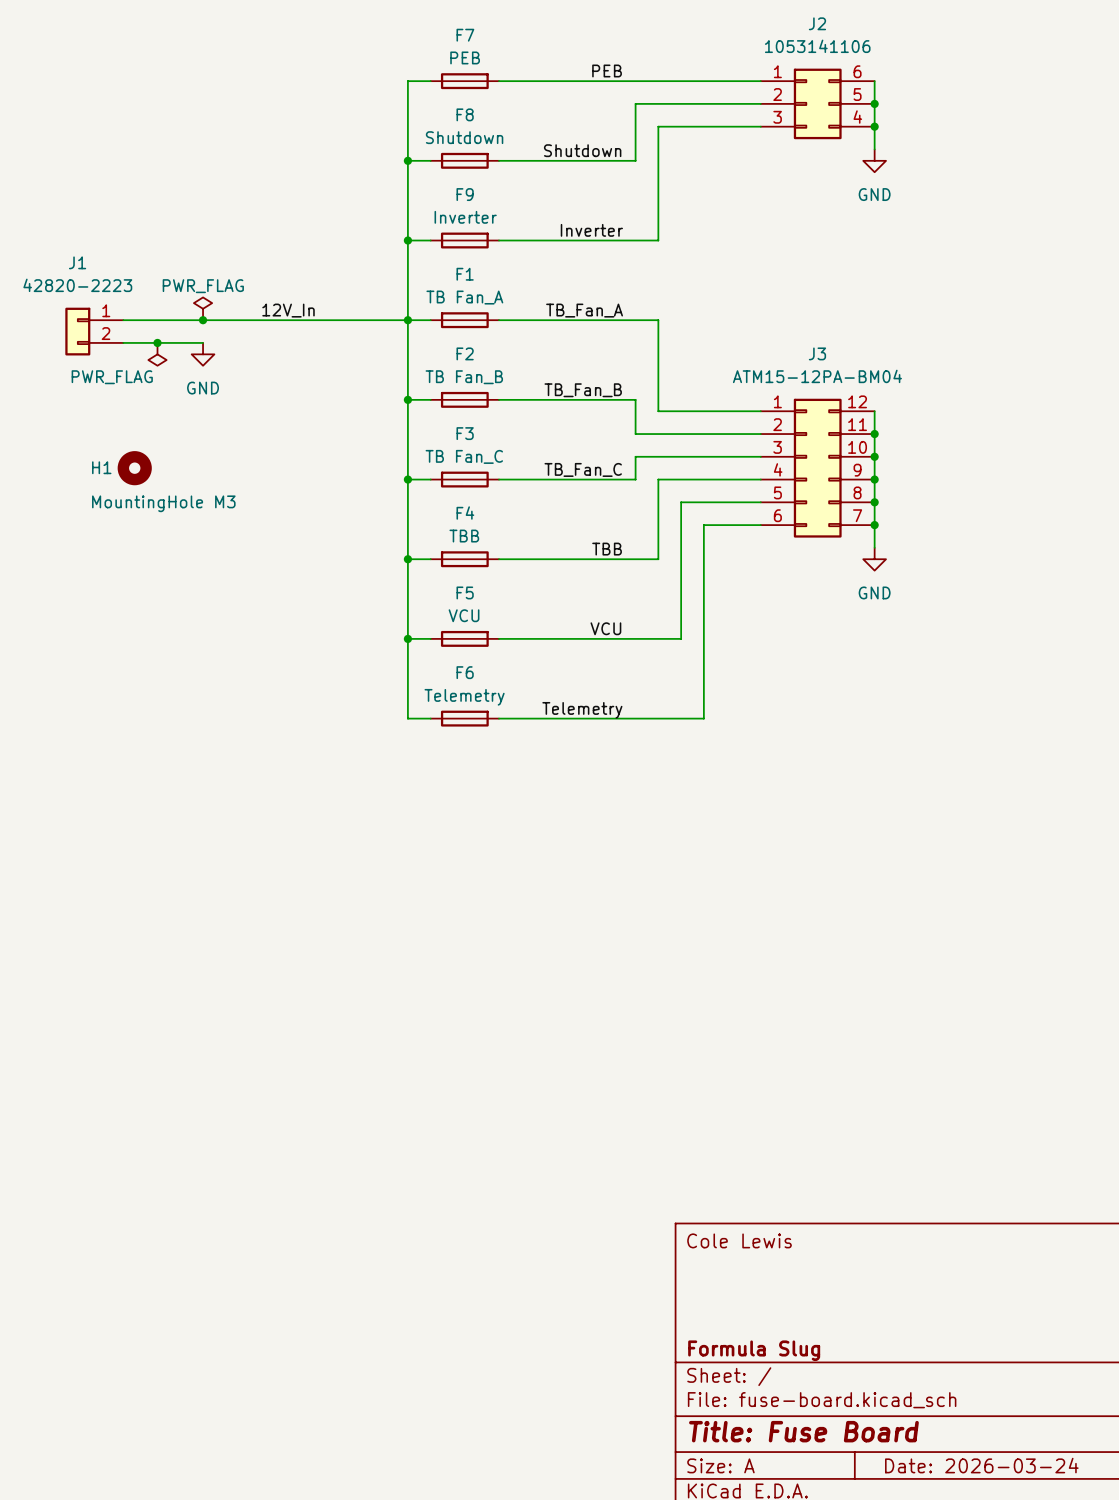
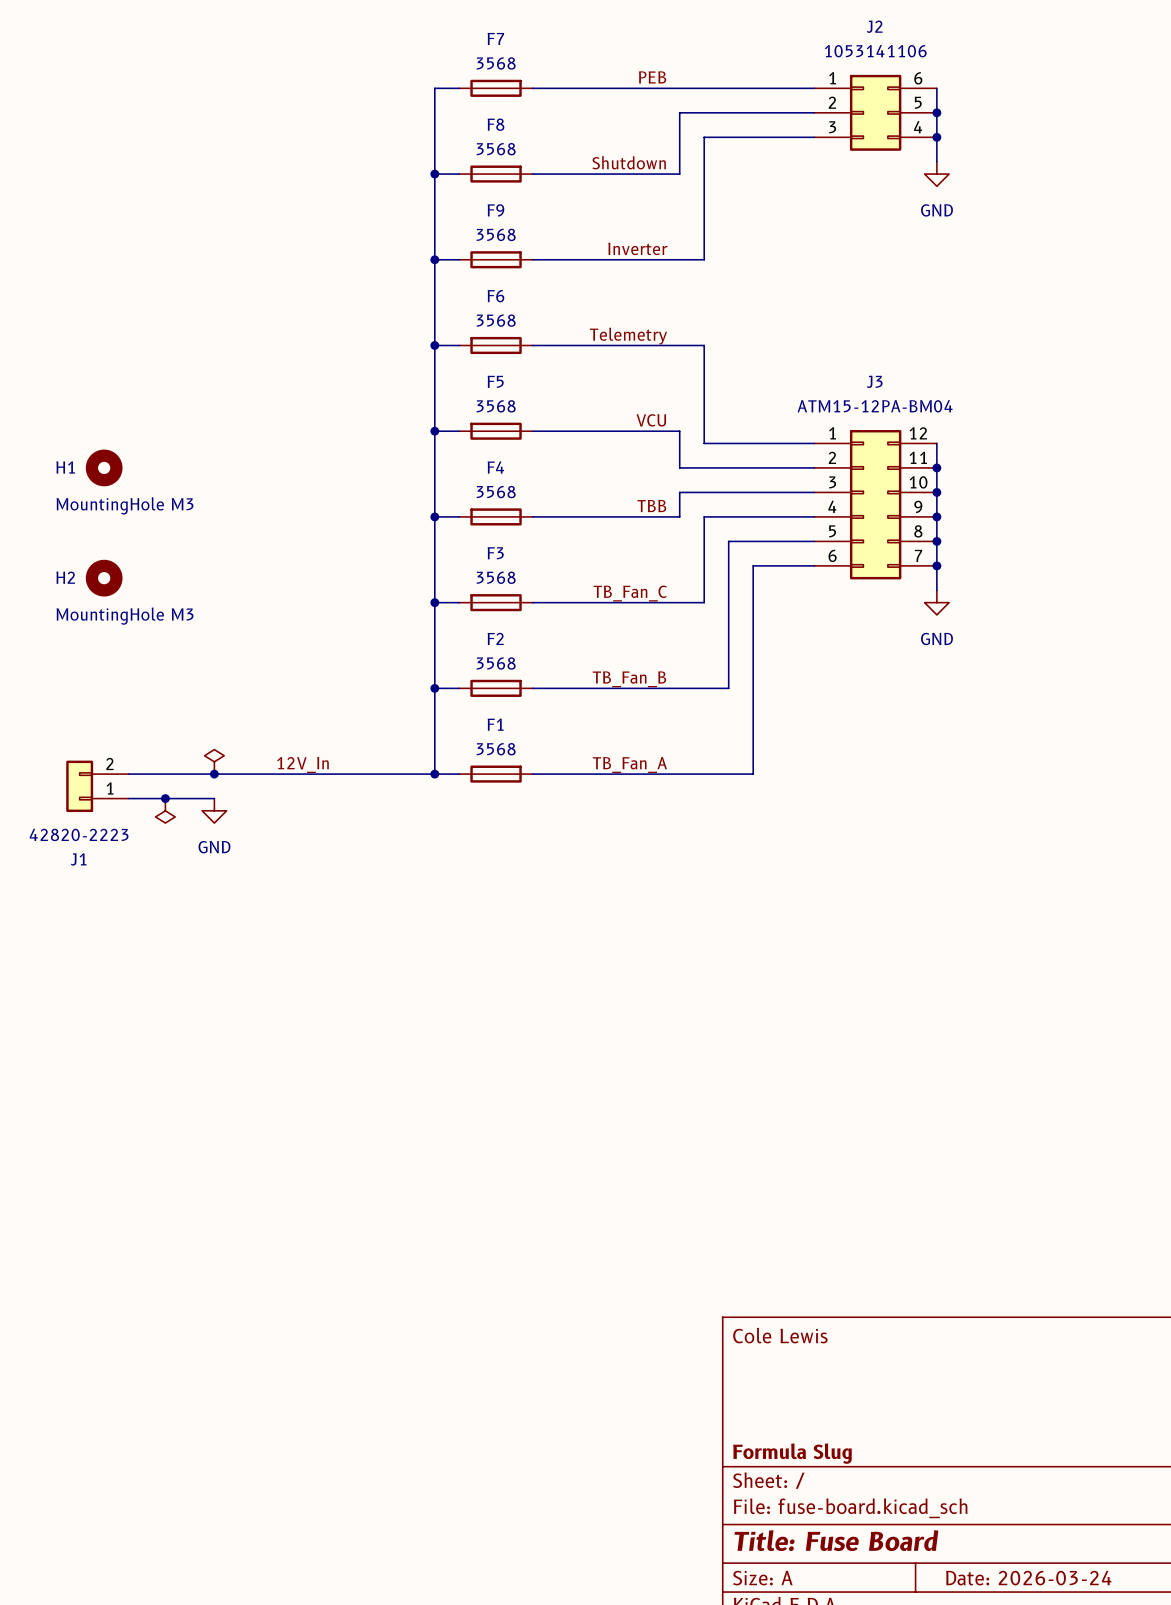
F7 value: PEB (465, 57) -> 3568 (496, 63)
F8 value: Shutdown (464, 137) -> 3568 (496, 149)
F9 value: Inverter (465, 217) -> 3568 (496, 234)
F1 name: F1 (465, 274) -> F6 (495, 296)
F1 value: TB Fan_A (464, 297) -> 3568 (496, 320)
power symbol: PWR_FLAG (203, 308) -> none
label: 12V_In (288, 310) -> none
label: TB_Fan_A (584, 310) -> Telemetry (628, 336)
wire: (123, 320) (407, 320) -> none
junction: (203, 320) -> none
J1 flip: as is (77, 331) -> up-down (79, 786)
J1 position: (94, 331) -> (97, 786)
wire: (123, 342) (203, 342) -> none
junction: (157, 342) -> none
F2 name: F2 (465, 353) -> F5 (495, 381)
power symbol: PWR_FLAG (157, 354) -> none
power symbol: GND (203, 354) -> none
F2 value: TB Fan_B (464, 377) -> 3568 (496, 406)
label: TB_Fan_B (583, 390) -> VCU (651, 420)
F3 name: F3 (465, 433) -> F4 (495, 467)
F3 value: TB Fan_C (464, 456) -> 3568 (496, 492)
H1 position: (134, 468) -> (104, 467)
label: TB_Fan_C (583, 469) -> TBB (651, 506)
F4 name: F4 (465, 513) -> F3 (495, 553)
H2: none -> MountingHole M3 (104, 578)
F4 value: TBB (464, 536) -> 3568 (496, 577)
label: TBB (607, 549) -> TB_Fan_C (630, 593)
F5 name: F5 (465, 592) -> F2 (495, 638)
F5 value: VCU (464, 615) -> 3568 (496, 663)
label: VCU (605, 628) -> TB_Fan_B (629, 679)
F6 name: F6 (465, 672) -> F1 (495, 724)
F6 value: Telemetry (464, 697) -> 3568 (496, 749)
power symbol: none -> (214, 761)
label: none -> 12V_In (302, 764)
label: Telemetry (582, 710) -> TB_Fan_A (629, 764)
wire: none -> (128, 774) (434, 774)
junction: none -> (214, 774)
junction: none -> (434, 774)
wire: none -> (128, 798) (214, 798)
junction: none -> (165, 798)
power symbol: none -> (165, 810)
power symbol: none -> GND (214, 810)

